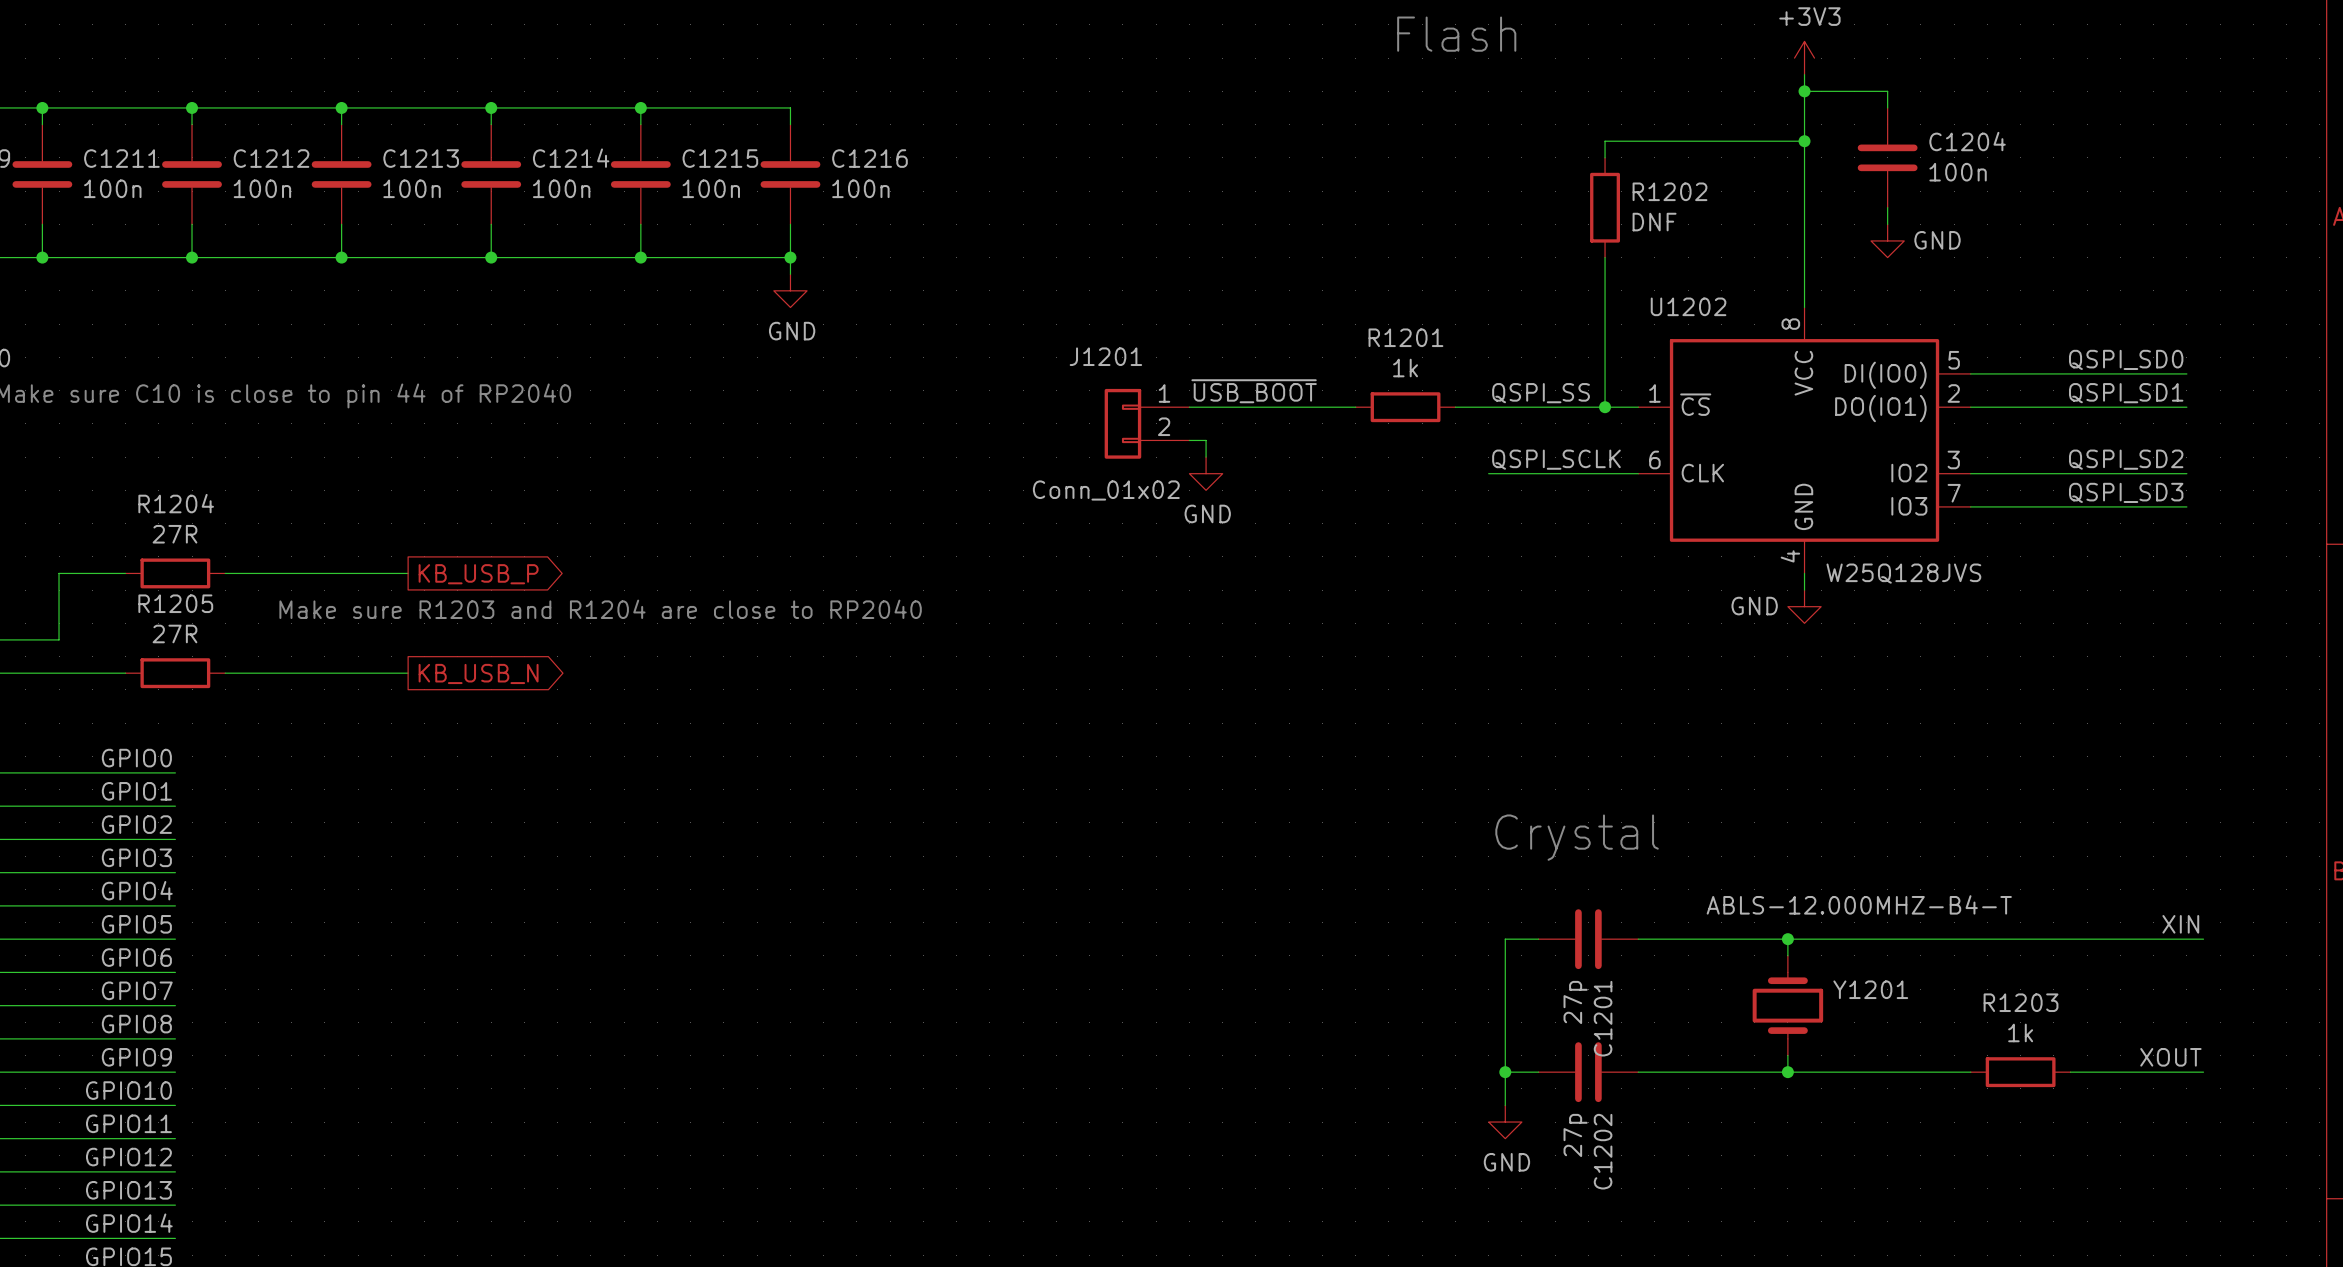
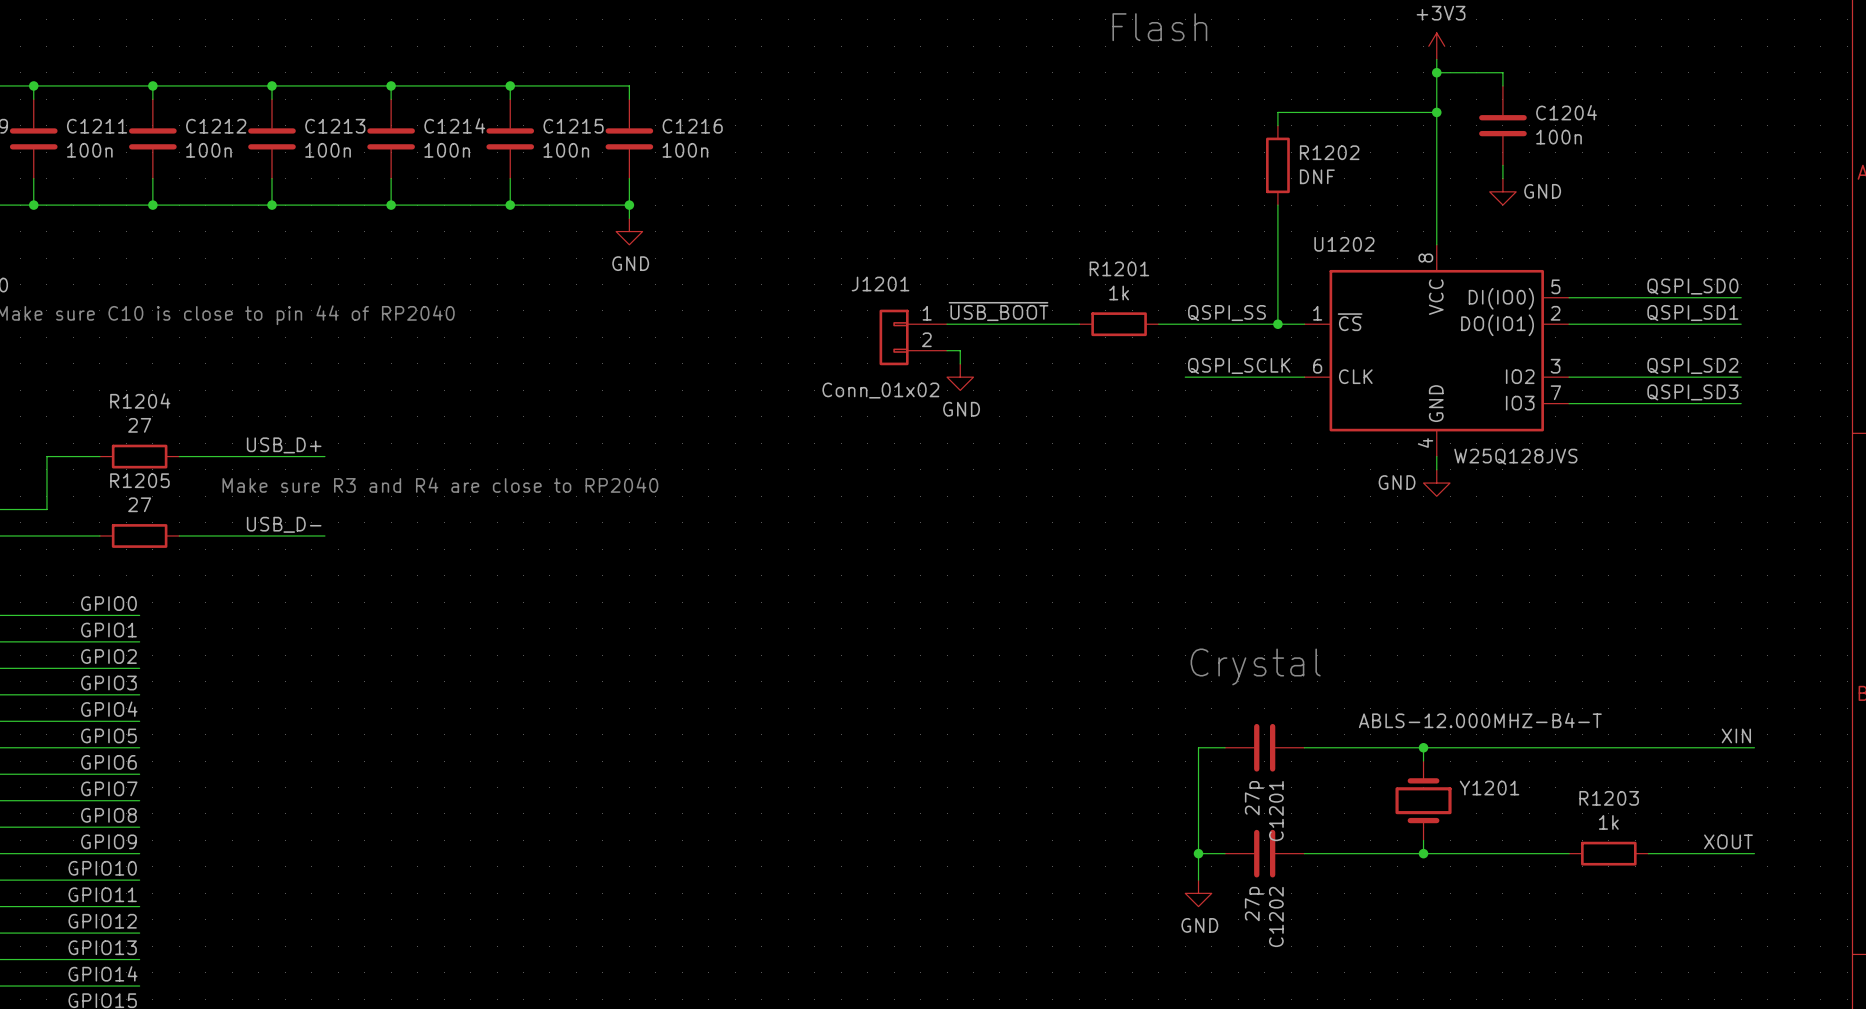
R1204 value: 27R (174, 534) -> 27 (139, 425)
label: none -> USB_D+ (284, 445)
global label: KB_USB_P (478, 574) -> none
text: Make sure R1203 and R1204 are close to RP2040 (600, 609) -> Make sure R3 and R4 are close to RP2040 (440, 485)
R1205 value: 27R (174, 633) -> 27 (139, 504)
label: none -> USB_D- (284, 524)
global label: KB_USB_N (478, 673) -> none

